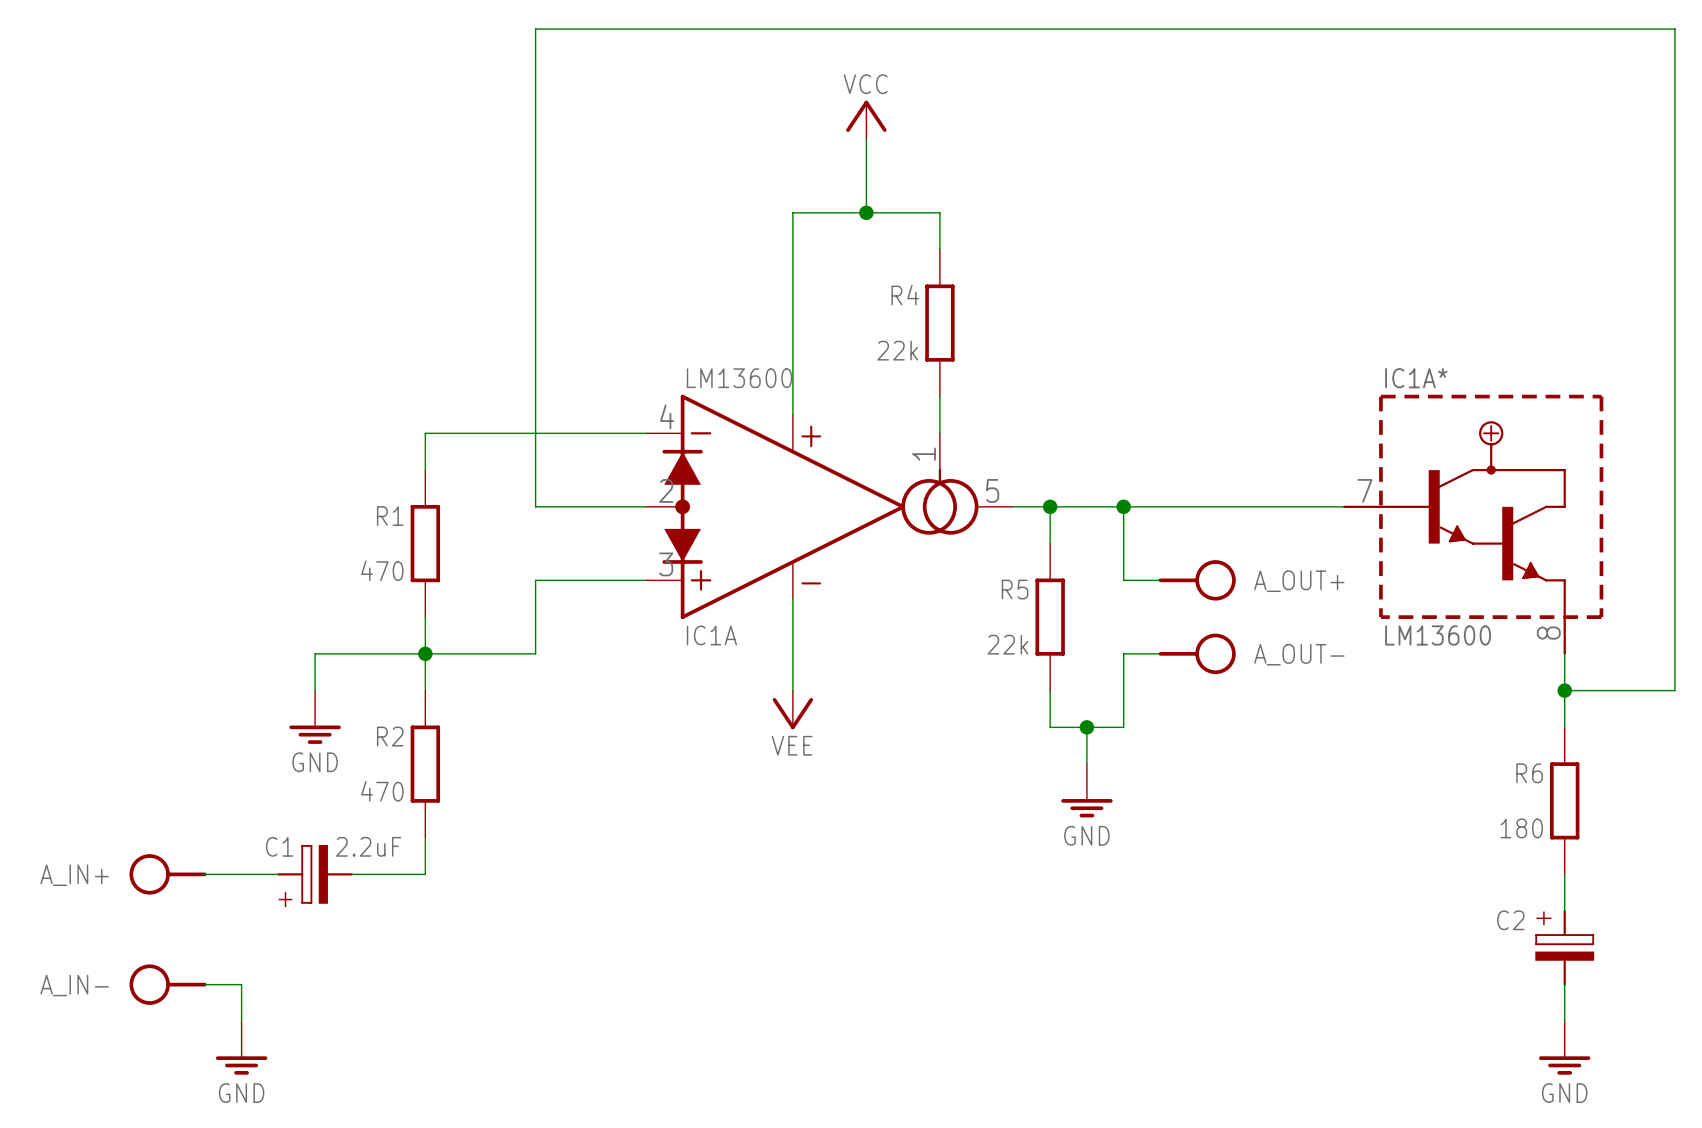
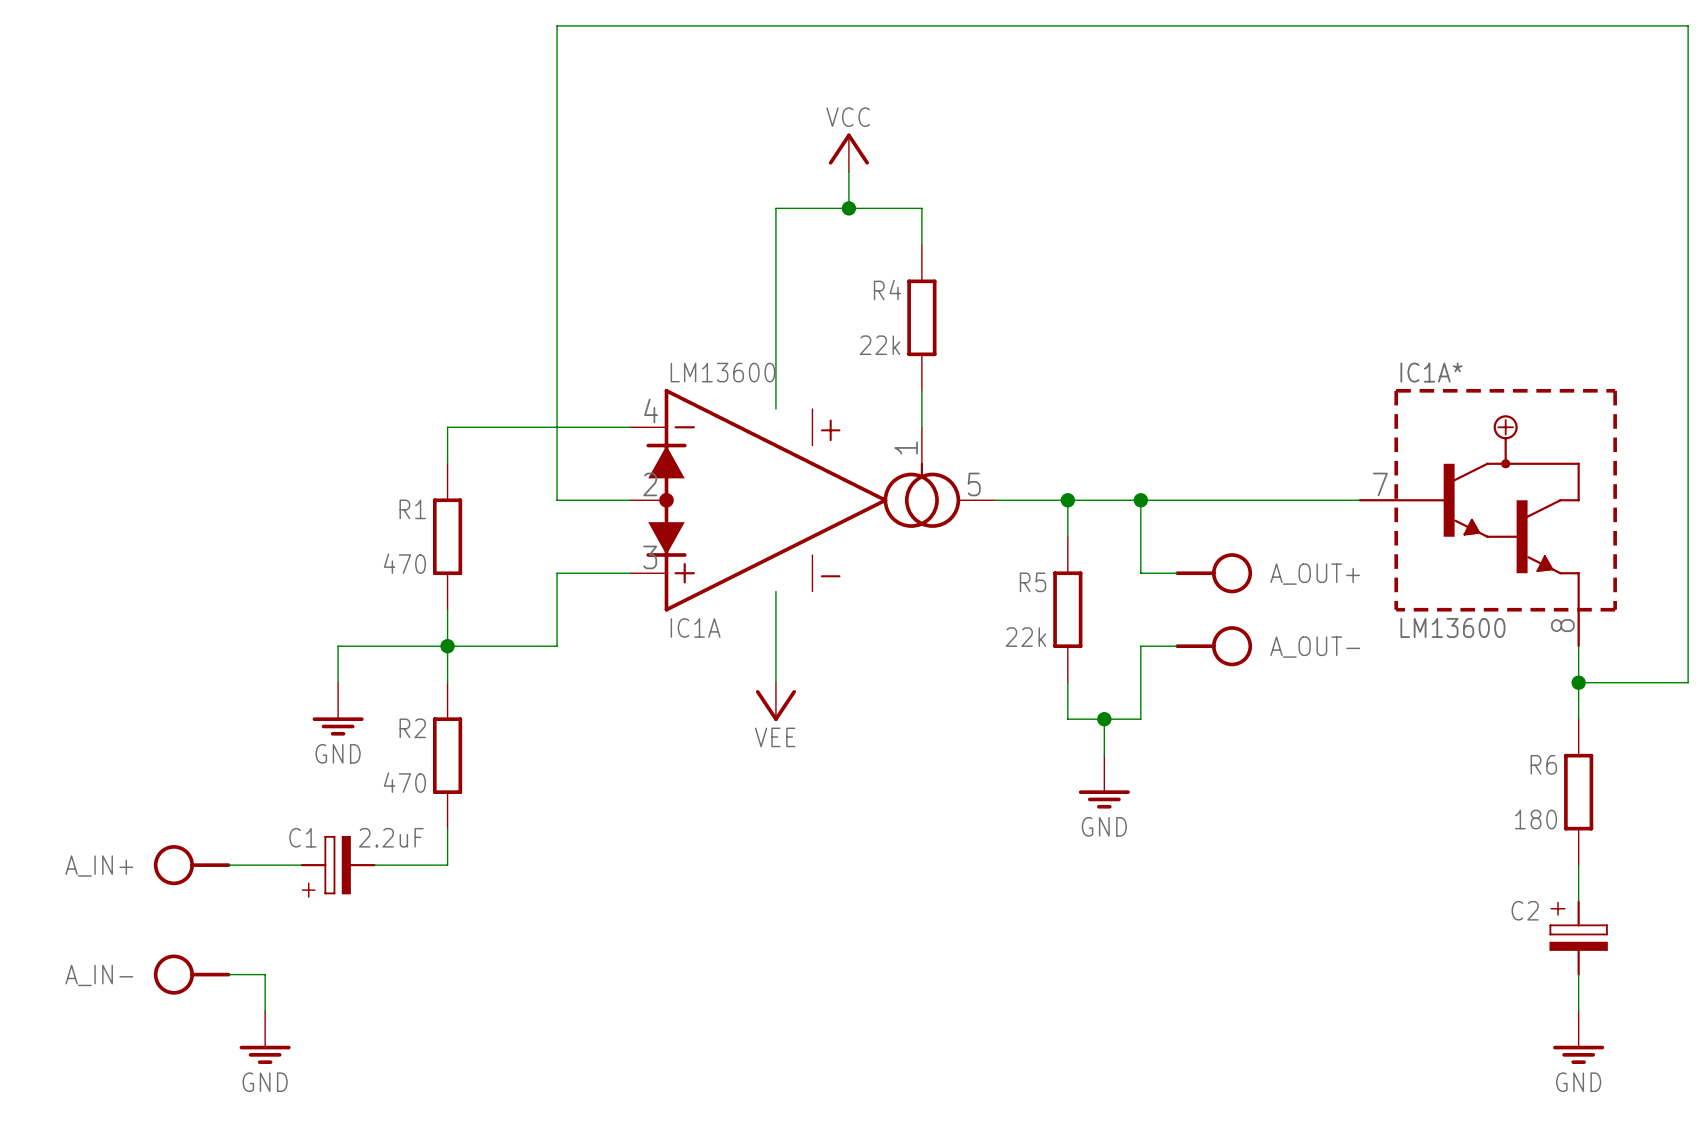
part position: (866, 120) -> (848, 152)
wire: (866, 139) (866, 212) -> none
wire: none -> (848, 171) (848, 208)
wire: (792, 212) (792, 414) -> (812, 208) (775, 208) (775, 409)
junction position: (866, 212) -> (848, 208)
wire: (903, 212) (939, 212) (939, 249) -> (921, 208) (921, 244)
R4 position: (939, 323) -> (921, 317)
wire: (939, 396) (939, 433) -> (921, 390) (921, 427)
IC1A position: (829, 506) -> (812, 500)
wire: (792, 598) (792, 690) -> (775, 591) (775, 682)
part position: (792, 709) -> (775, 701)

